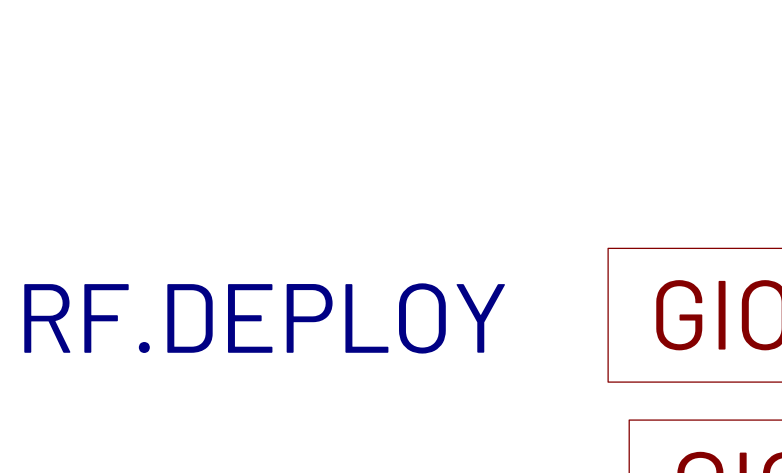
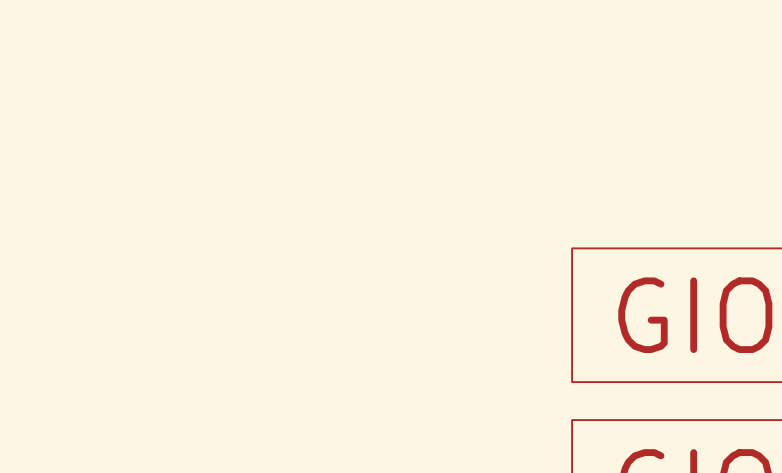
text: RF.DEPLOY (264, 318) -> none

